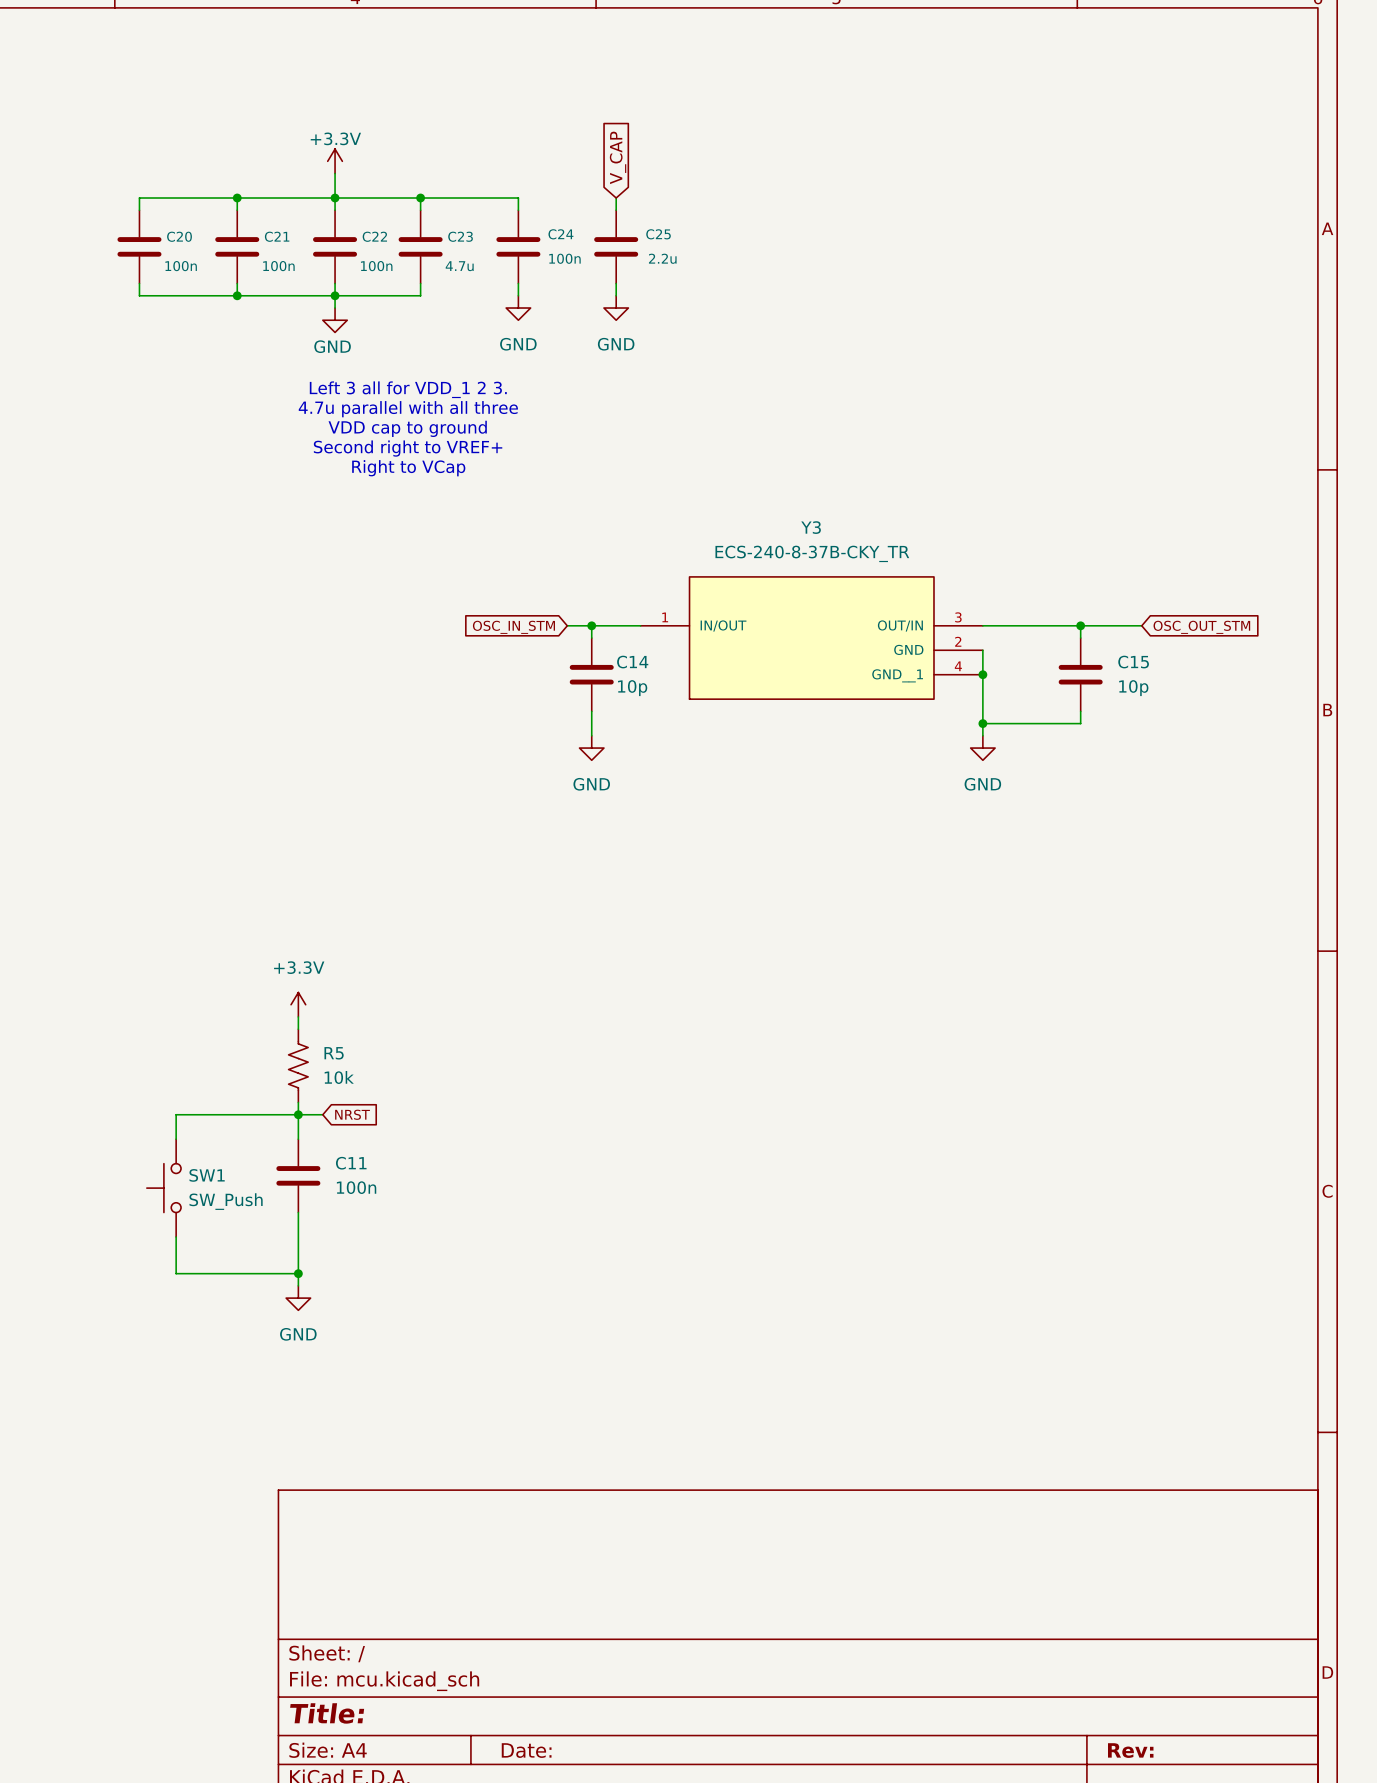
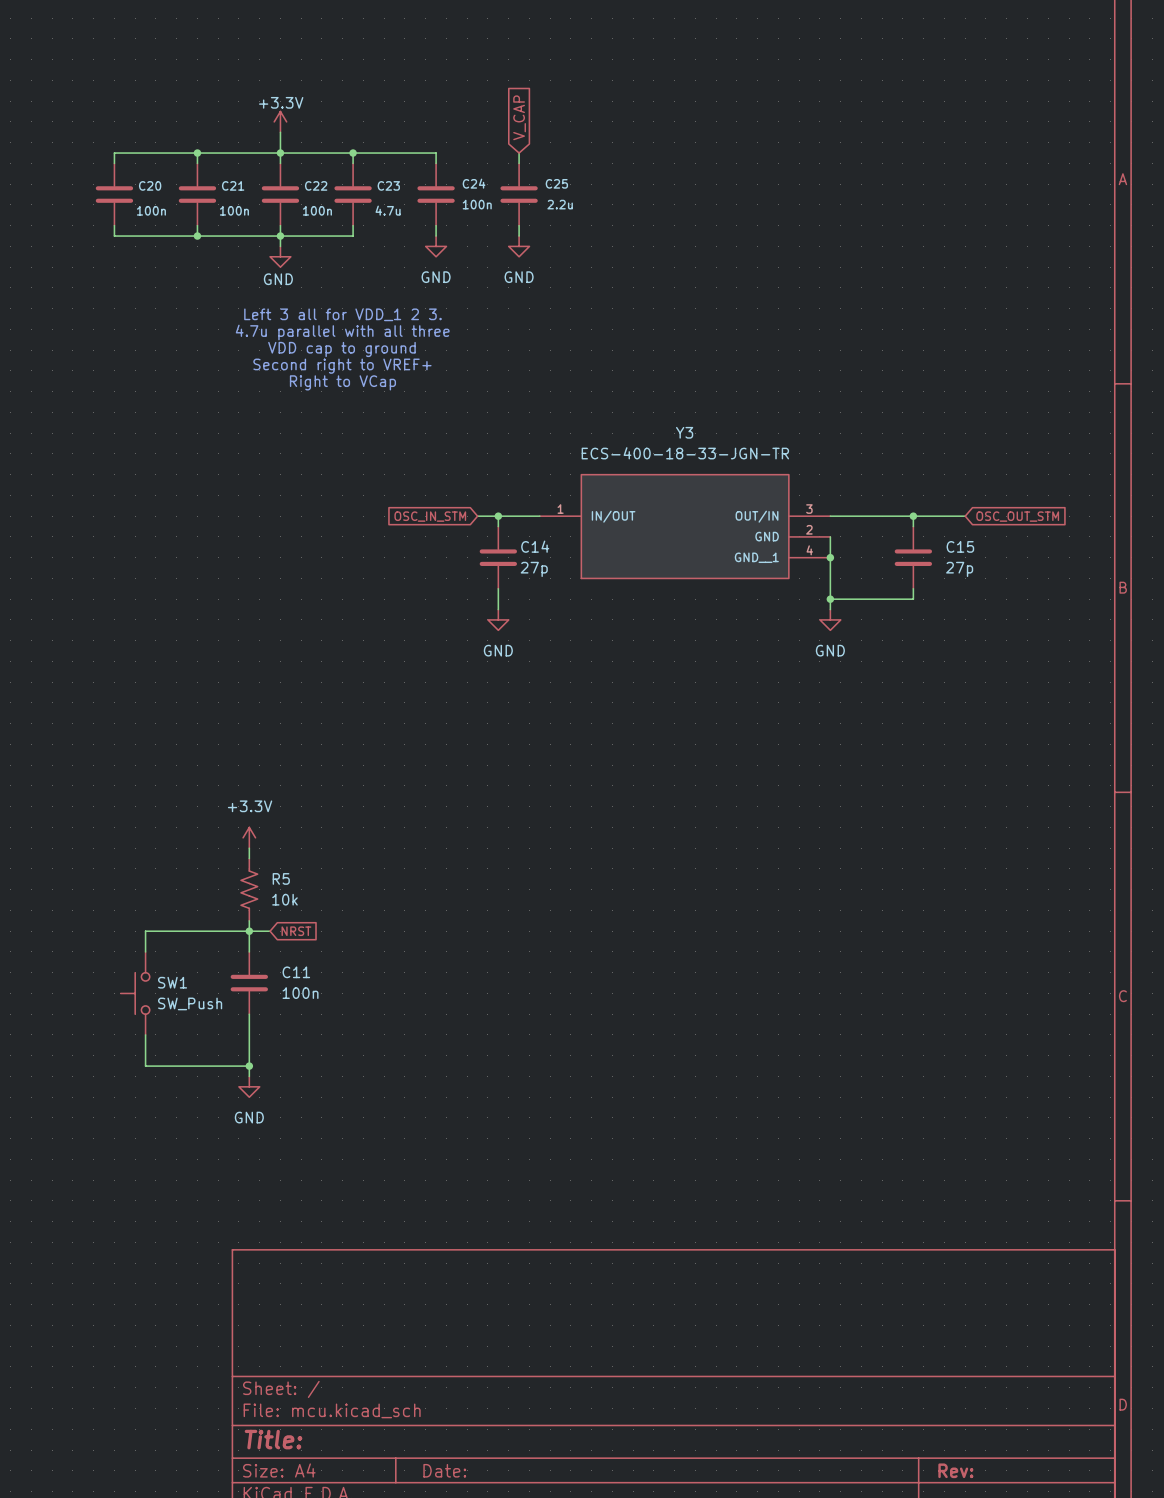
Y3 value: ECS-240-8-37B-CKY_TR (812, 553) -> ECS-400-18-33-JGN-TR (685, 453)
C14 value: 10p (632, 688) -> 27p (534, 569)
C15 value: 10p (1133, 688) -> 27p (959, 569)

